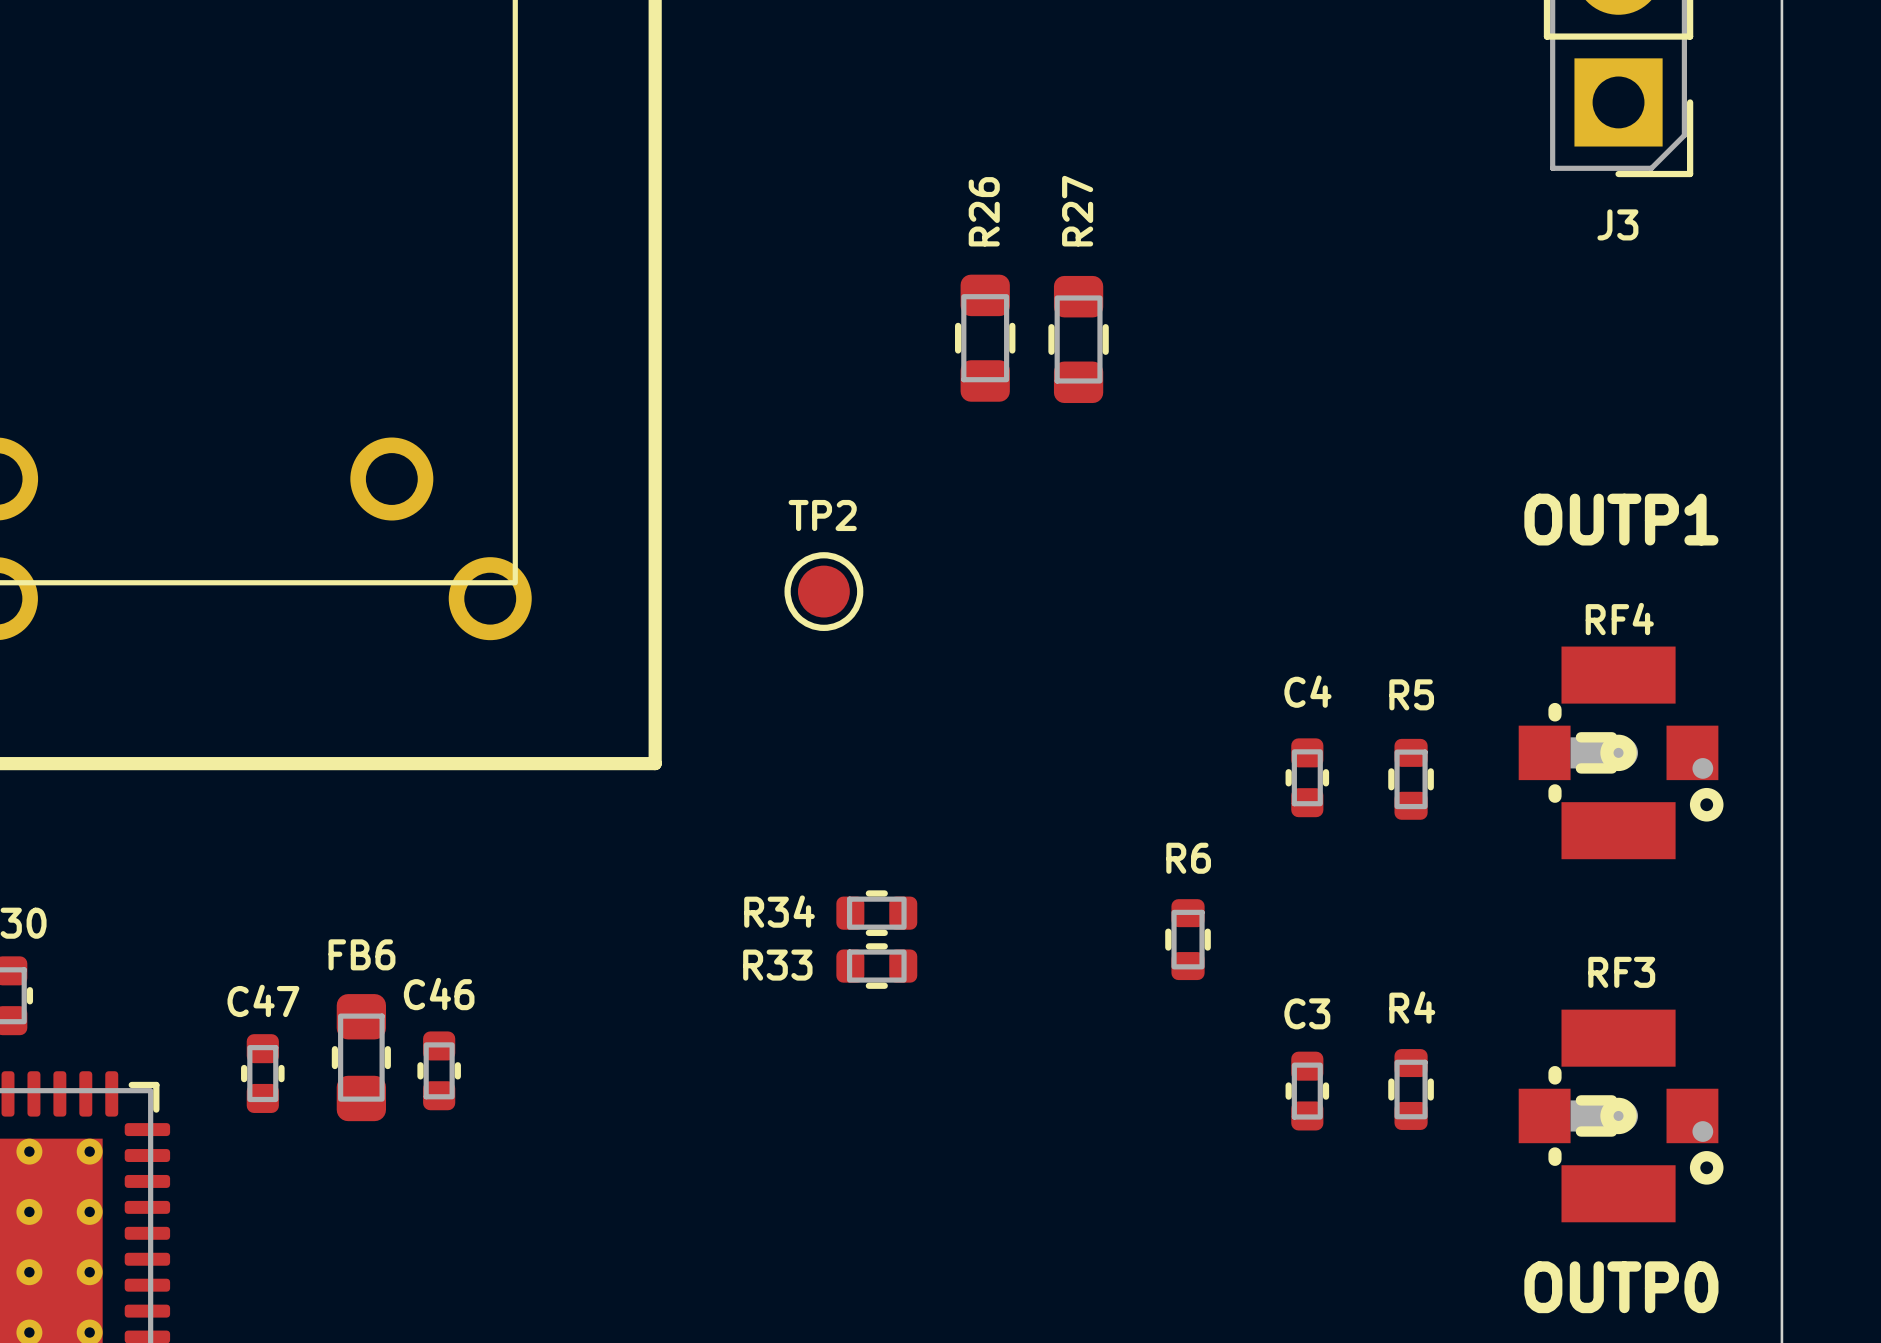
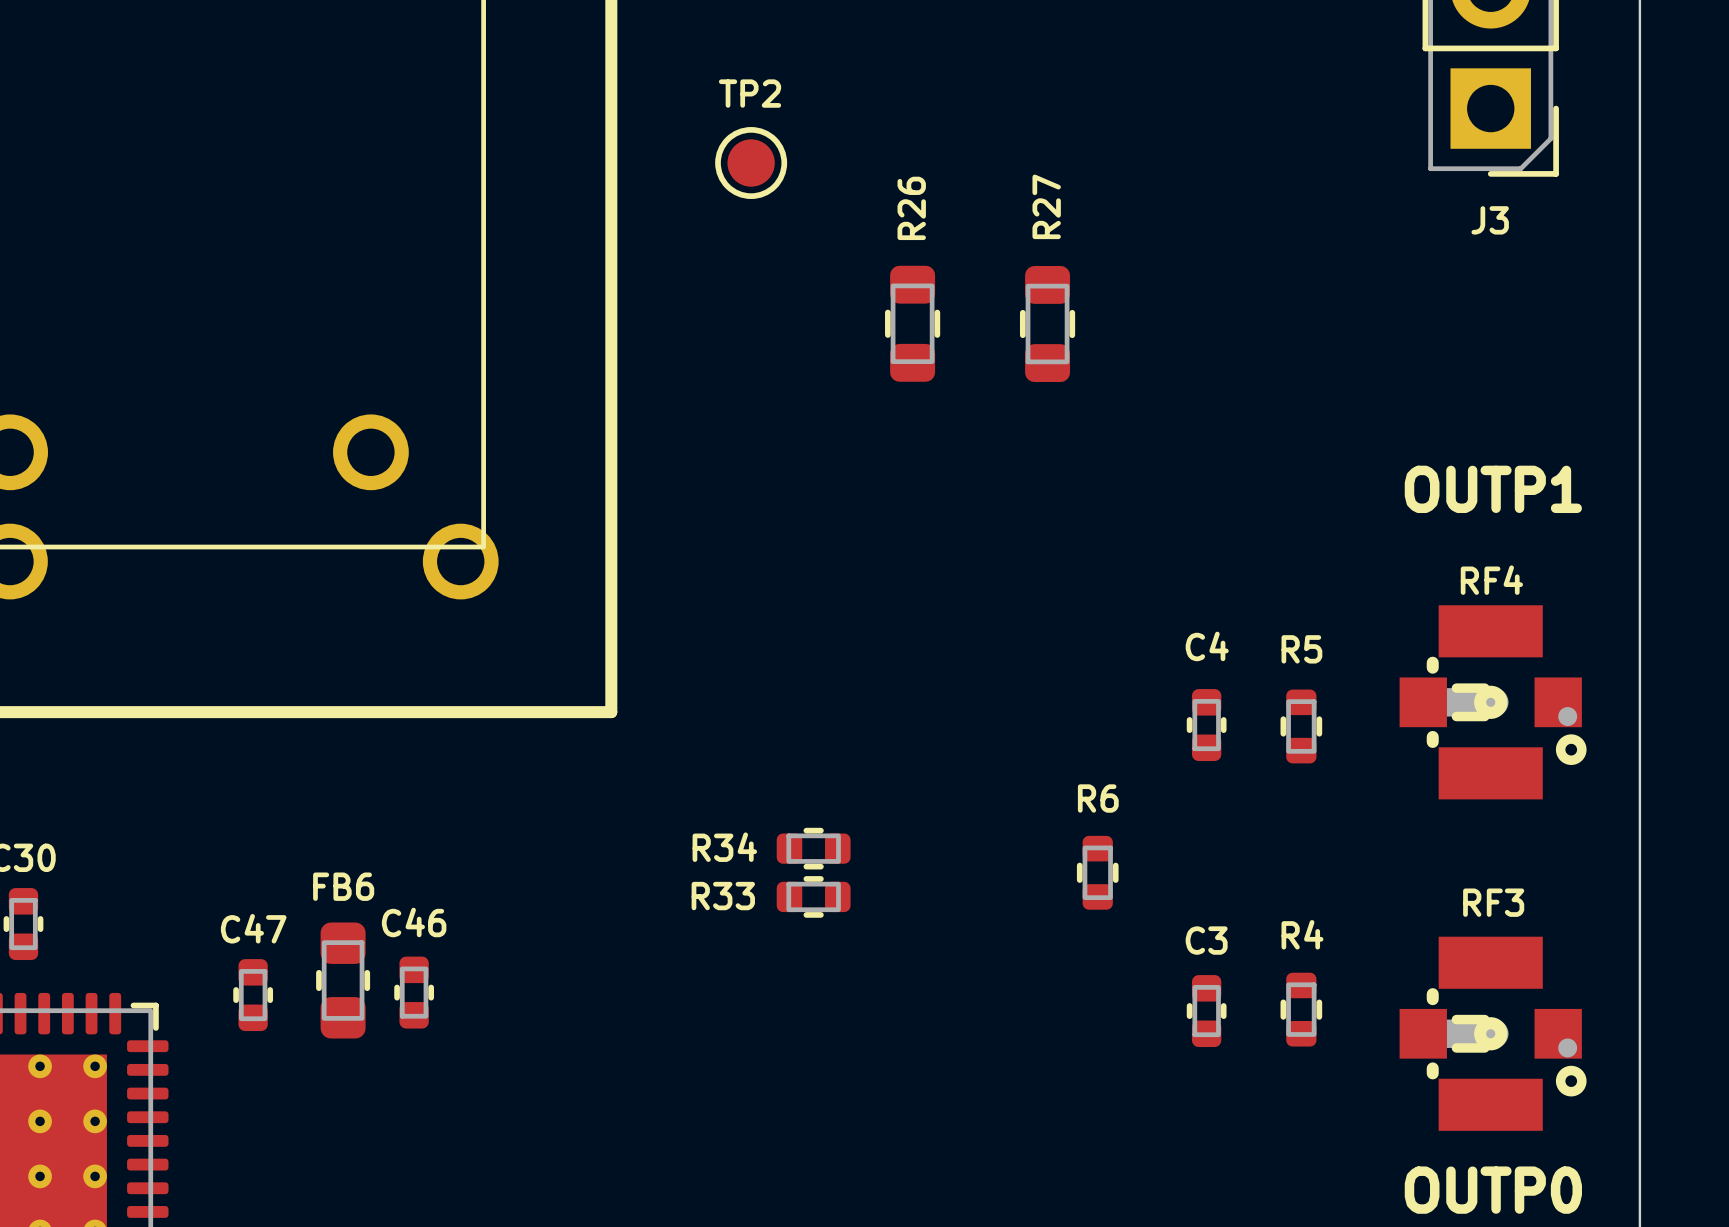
R27 position: (1078, 339) -> (1047, 324)
TP2 position: (823, 591) -> (751, 163)

